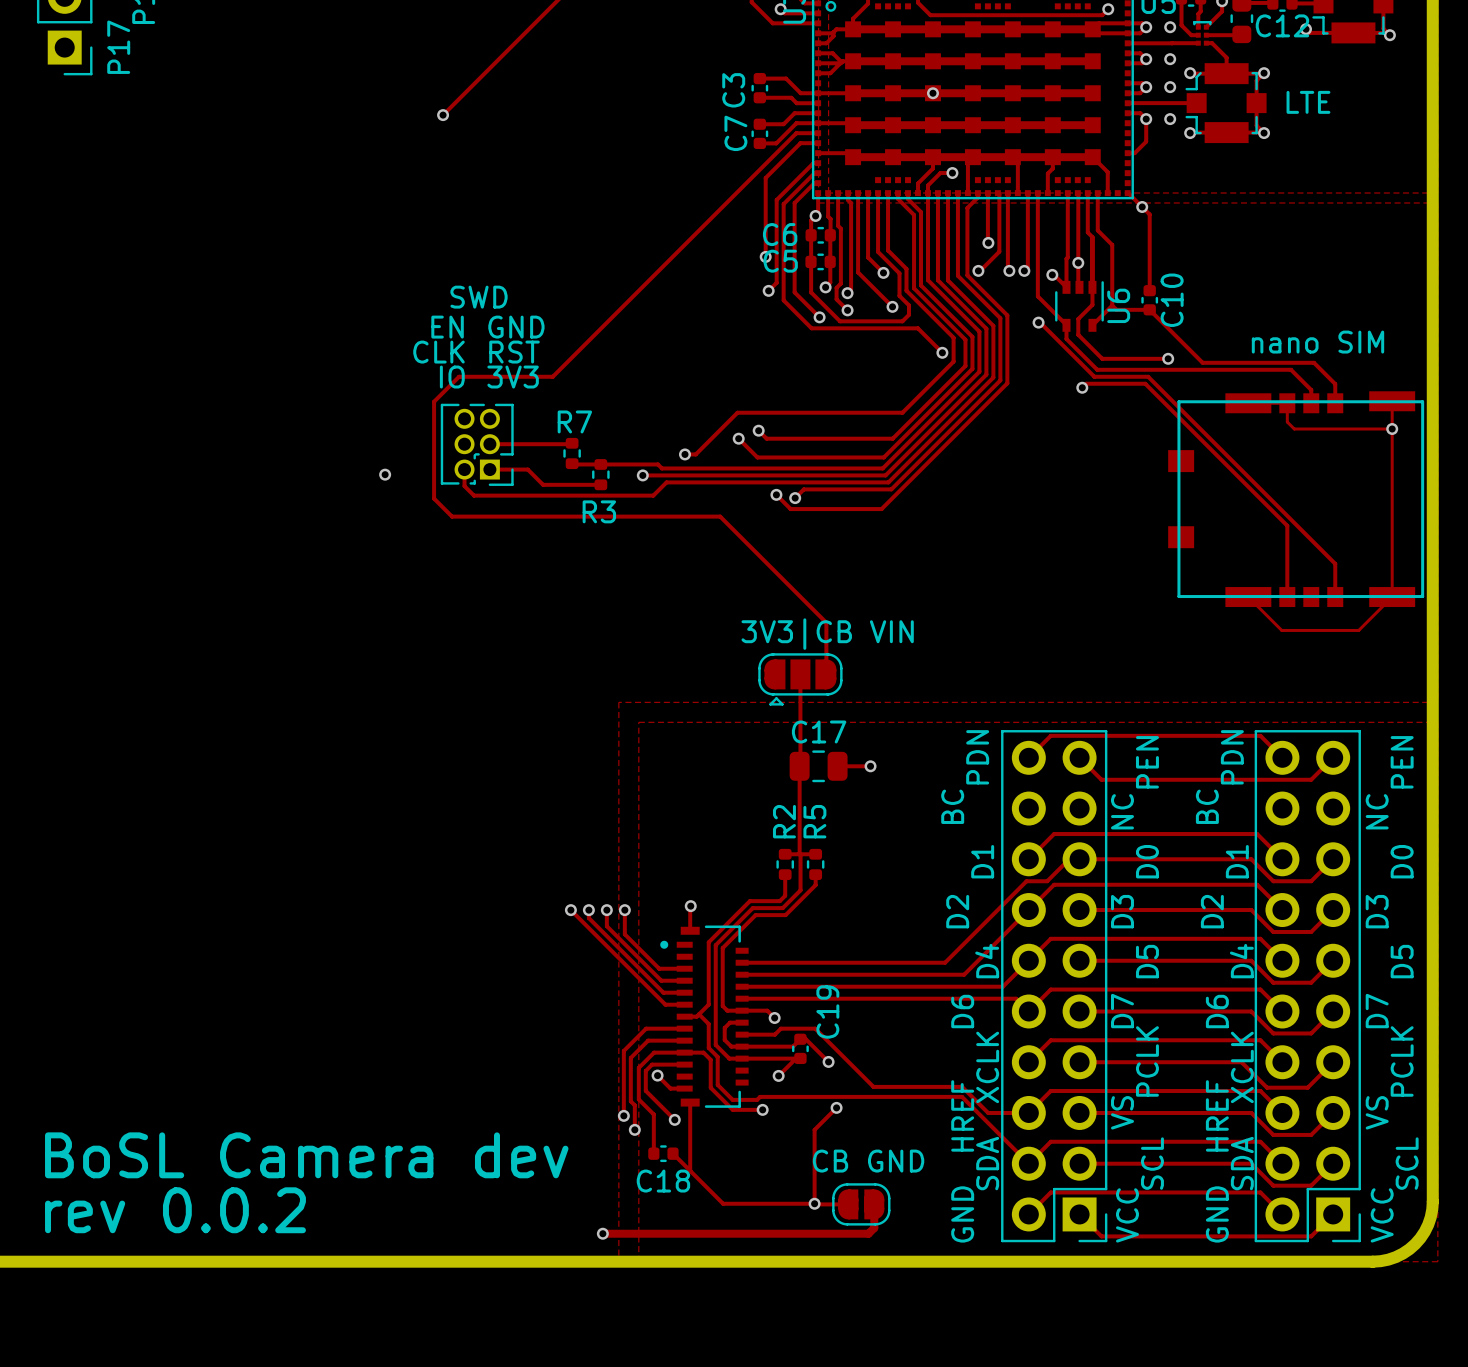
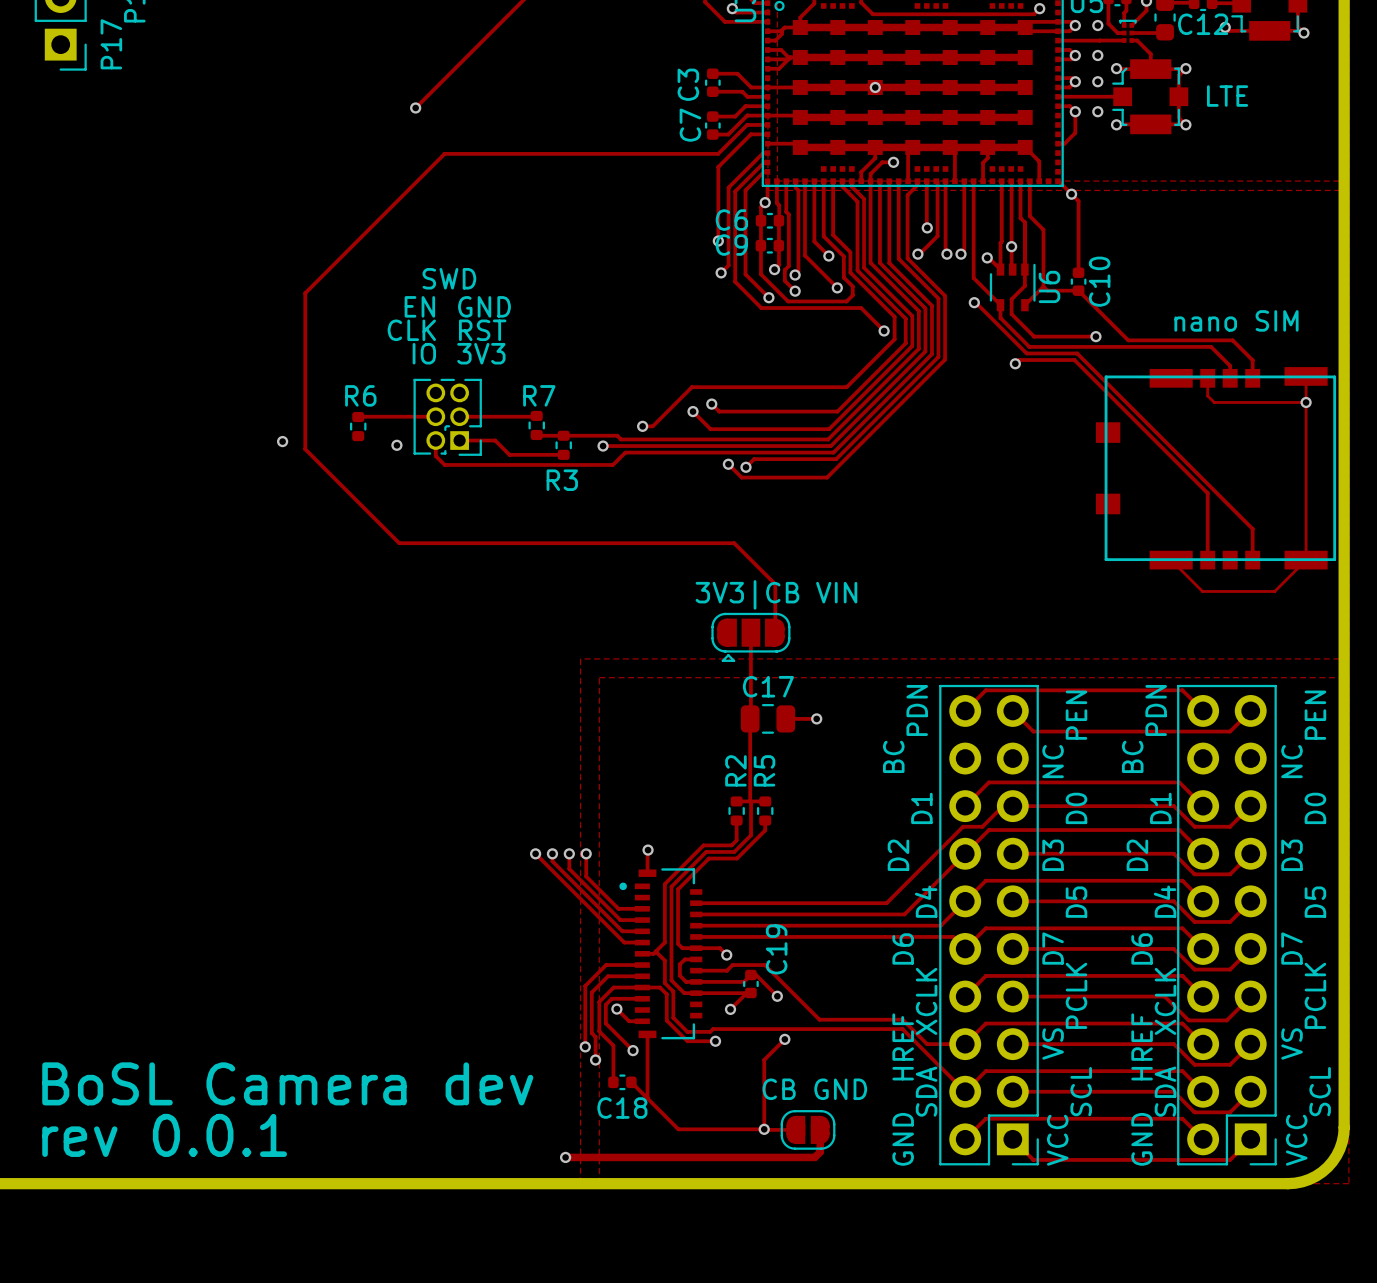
track: (765, 164) (552, 376) (459, 376) (434, 401) (434, 498) (452, 516) (720, 516) (782, 579) -> (718, 153) (444, 153) (305, 293) (305, 449) (399, 543) (734, 543)
C5 name: C5 (780, 261) -> C9 (731, 245)
track: none -> (435, 416) (358, 417)
R6: none -> (358, 426)
via: none -> (282, 441)
via position: (385, 474) -> (396, 445)
text: rev 0.0.2 (175, 1210) -> rev 0.0.1 (164, 1135)

